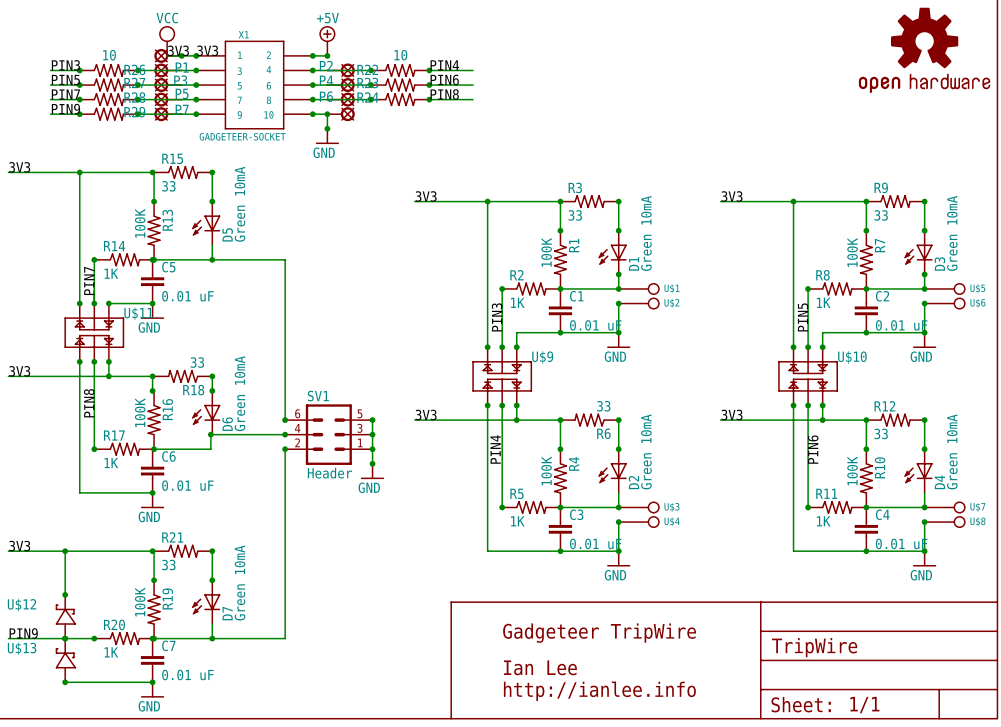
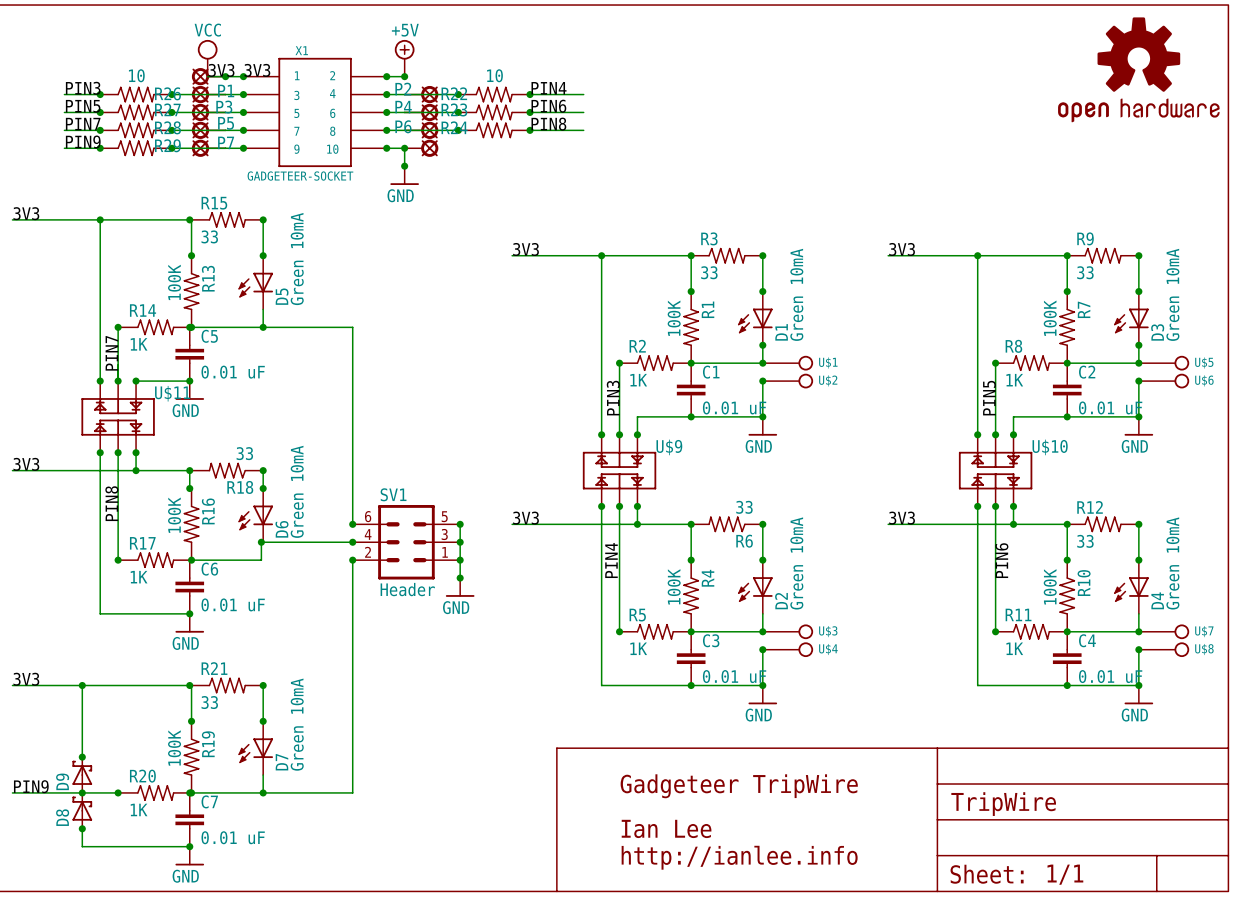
junction position: (65, 594) -> (82, 757)
U$12: (65, 616) -> none
D9: none -> (82, 775)
D8: none -> (82, 810)
U$13: (65, 660) -> none
junction position: (65, 682) -> (82, 828)

